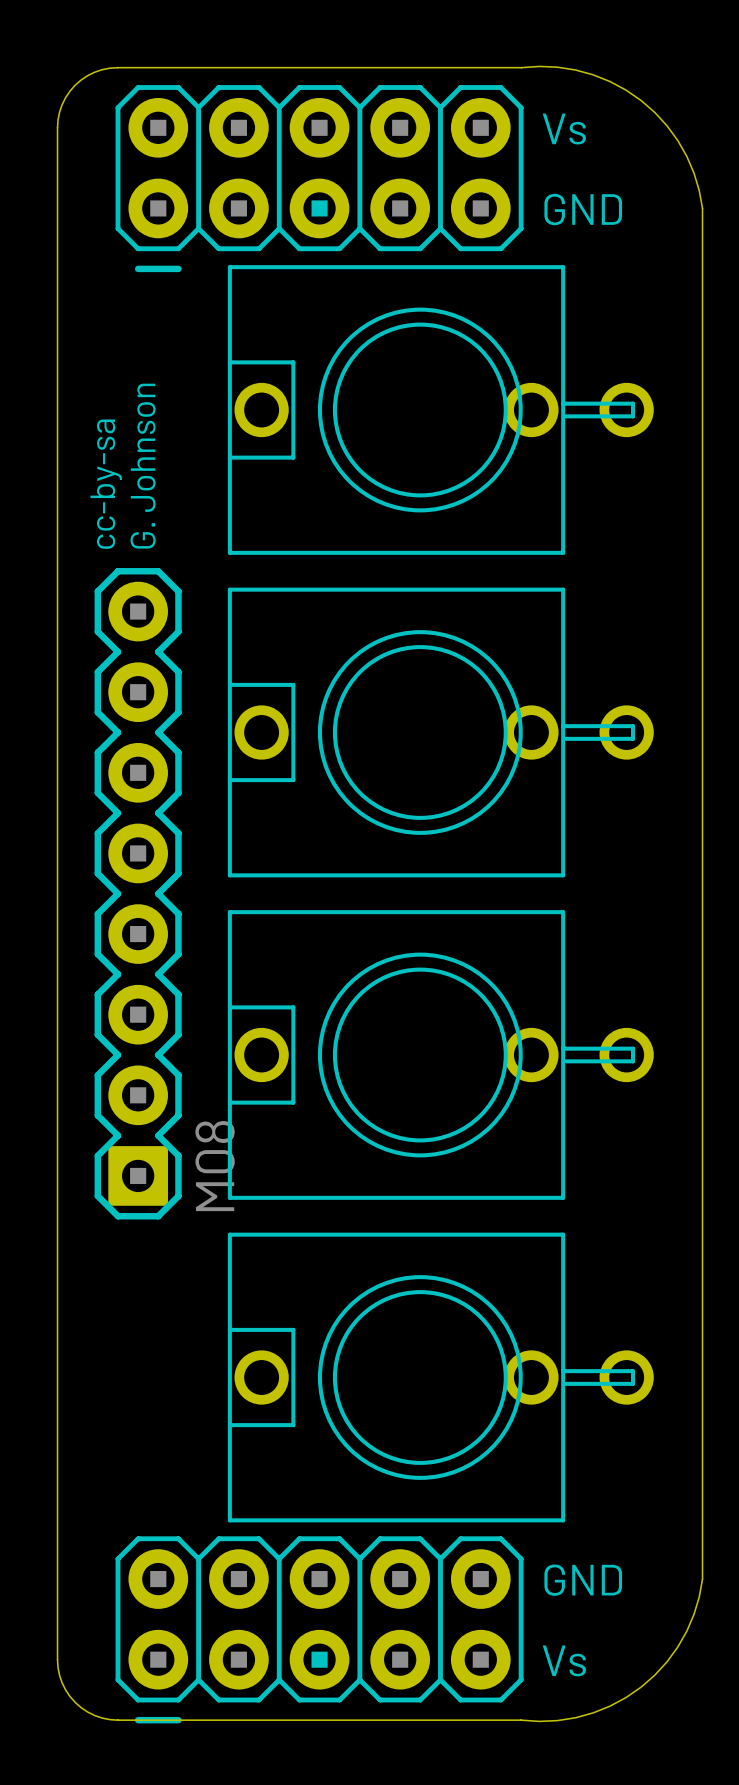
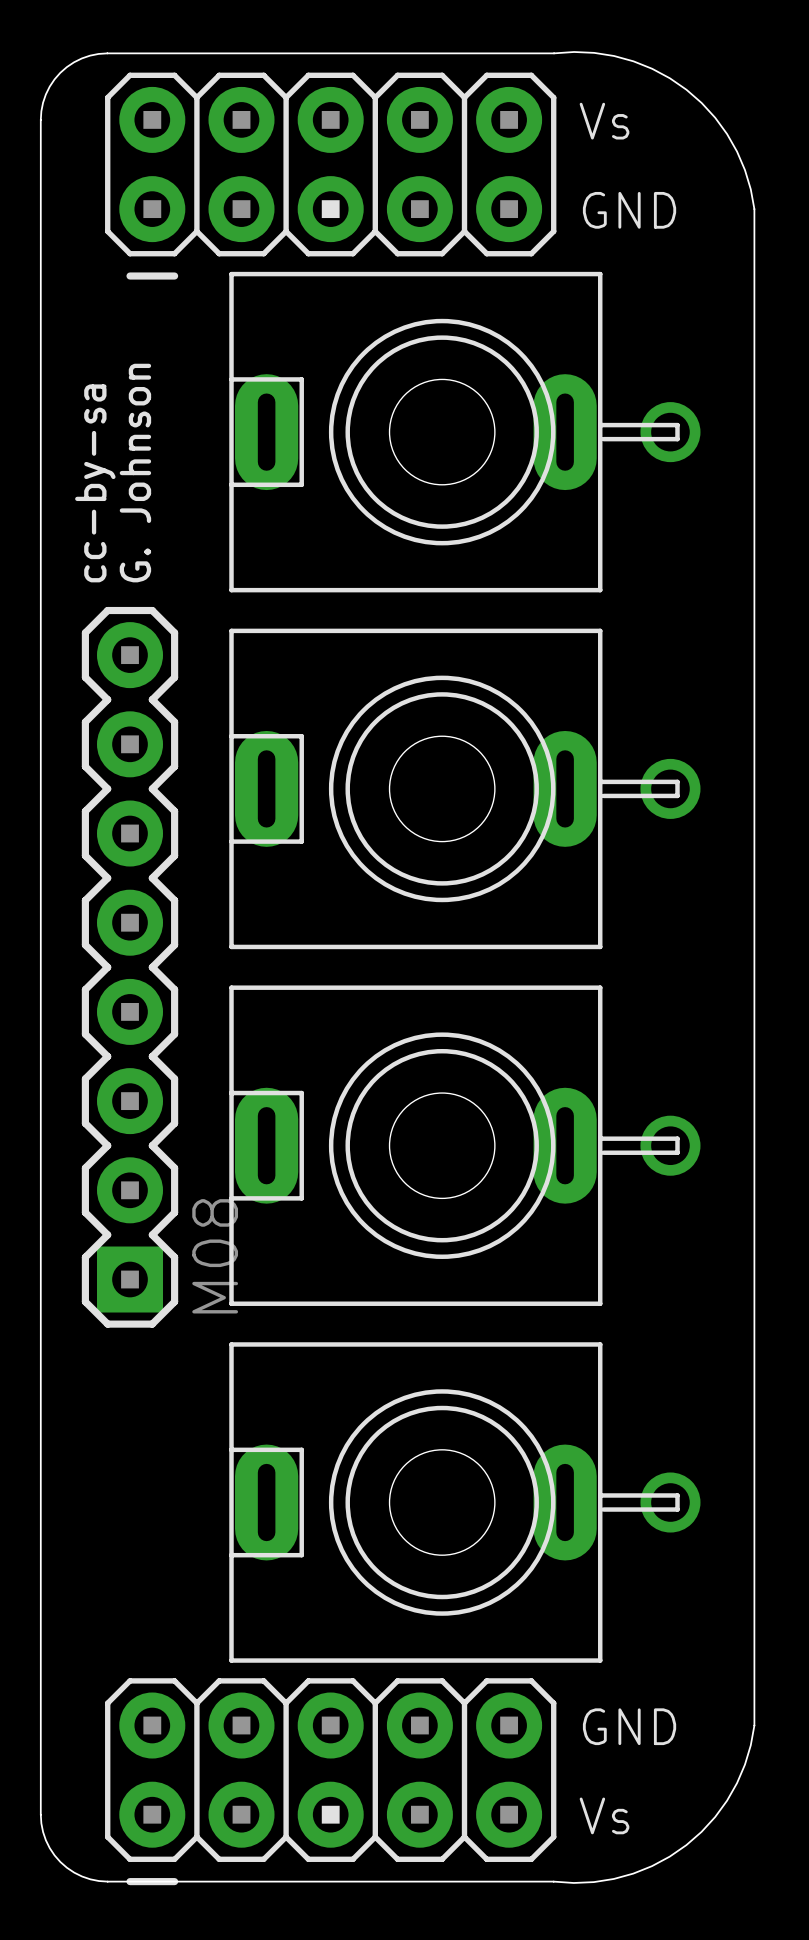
part footprint: [227, 265, 654, 555] -> [229, 271, 701, 593]
part footprint: [227, 587, 654, 878] -> [229, 628, 701, 950]
part footprint: [227, 910, 654, 1200] -> [229, 985, 701, 1306]
part footprint: [227, 1232, 654, 1523] -> [229, 1342, 701, 1663]

